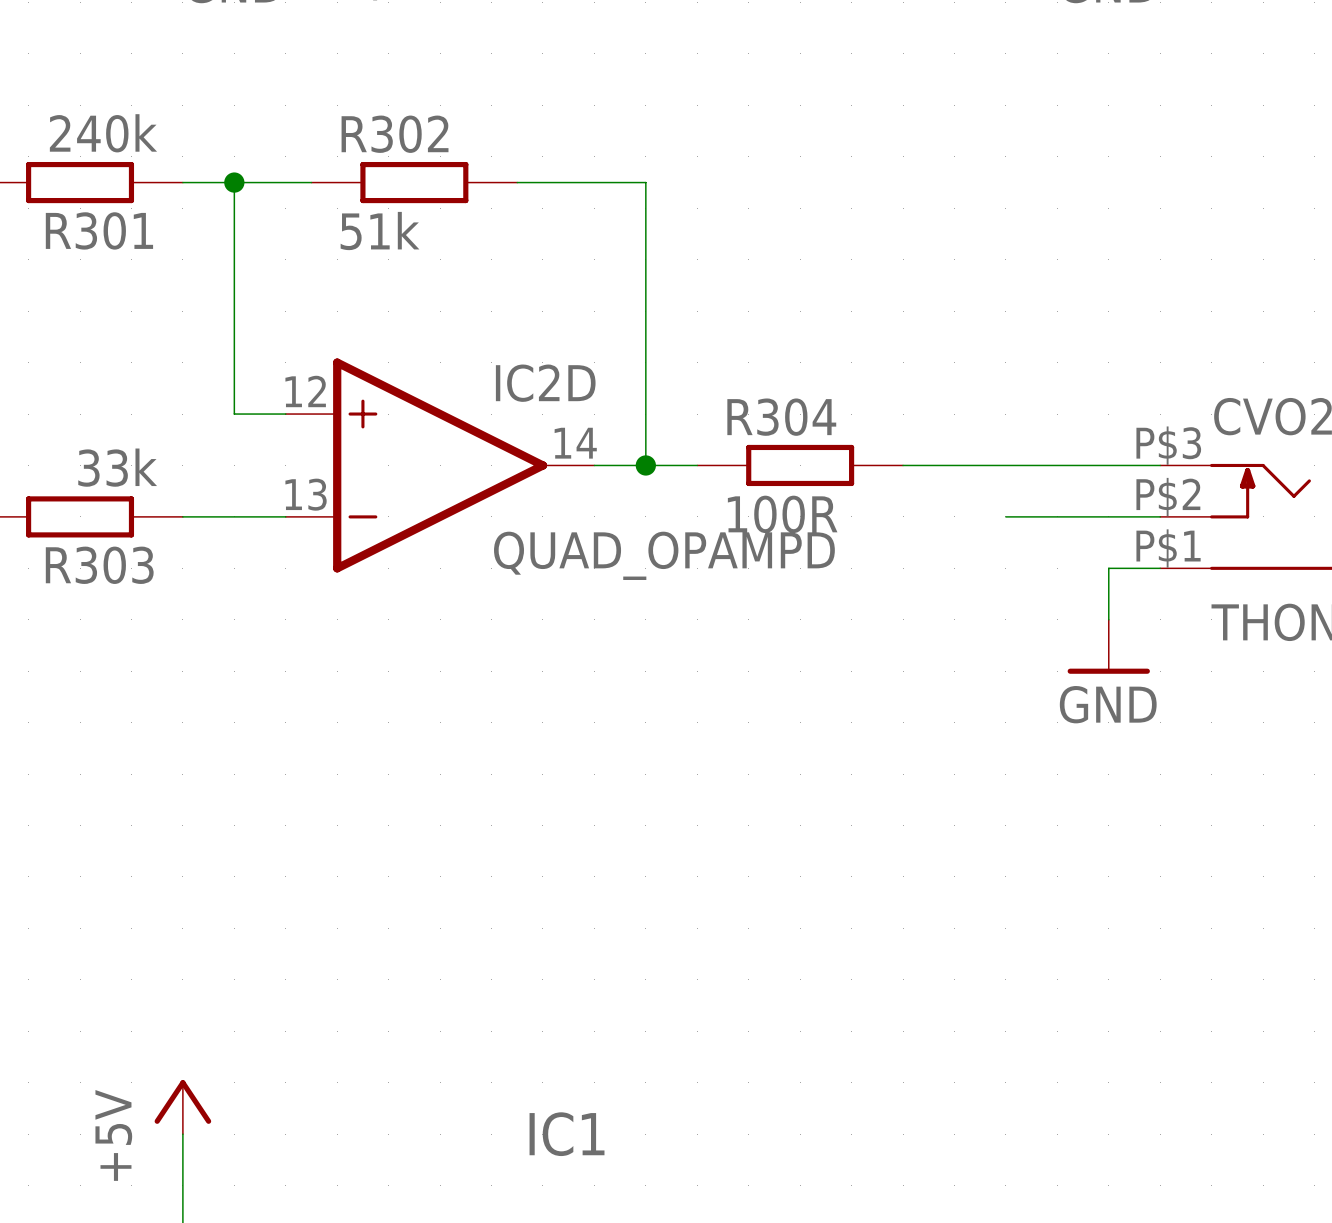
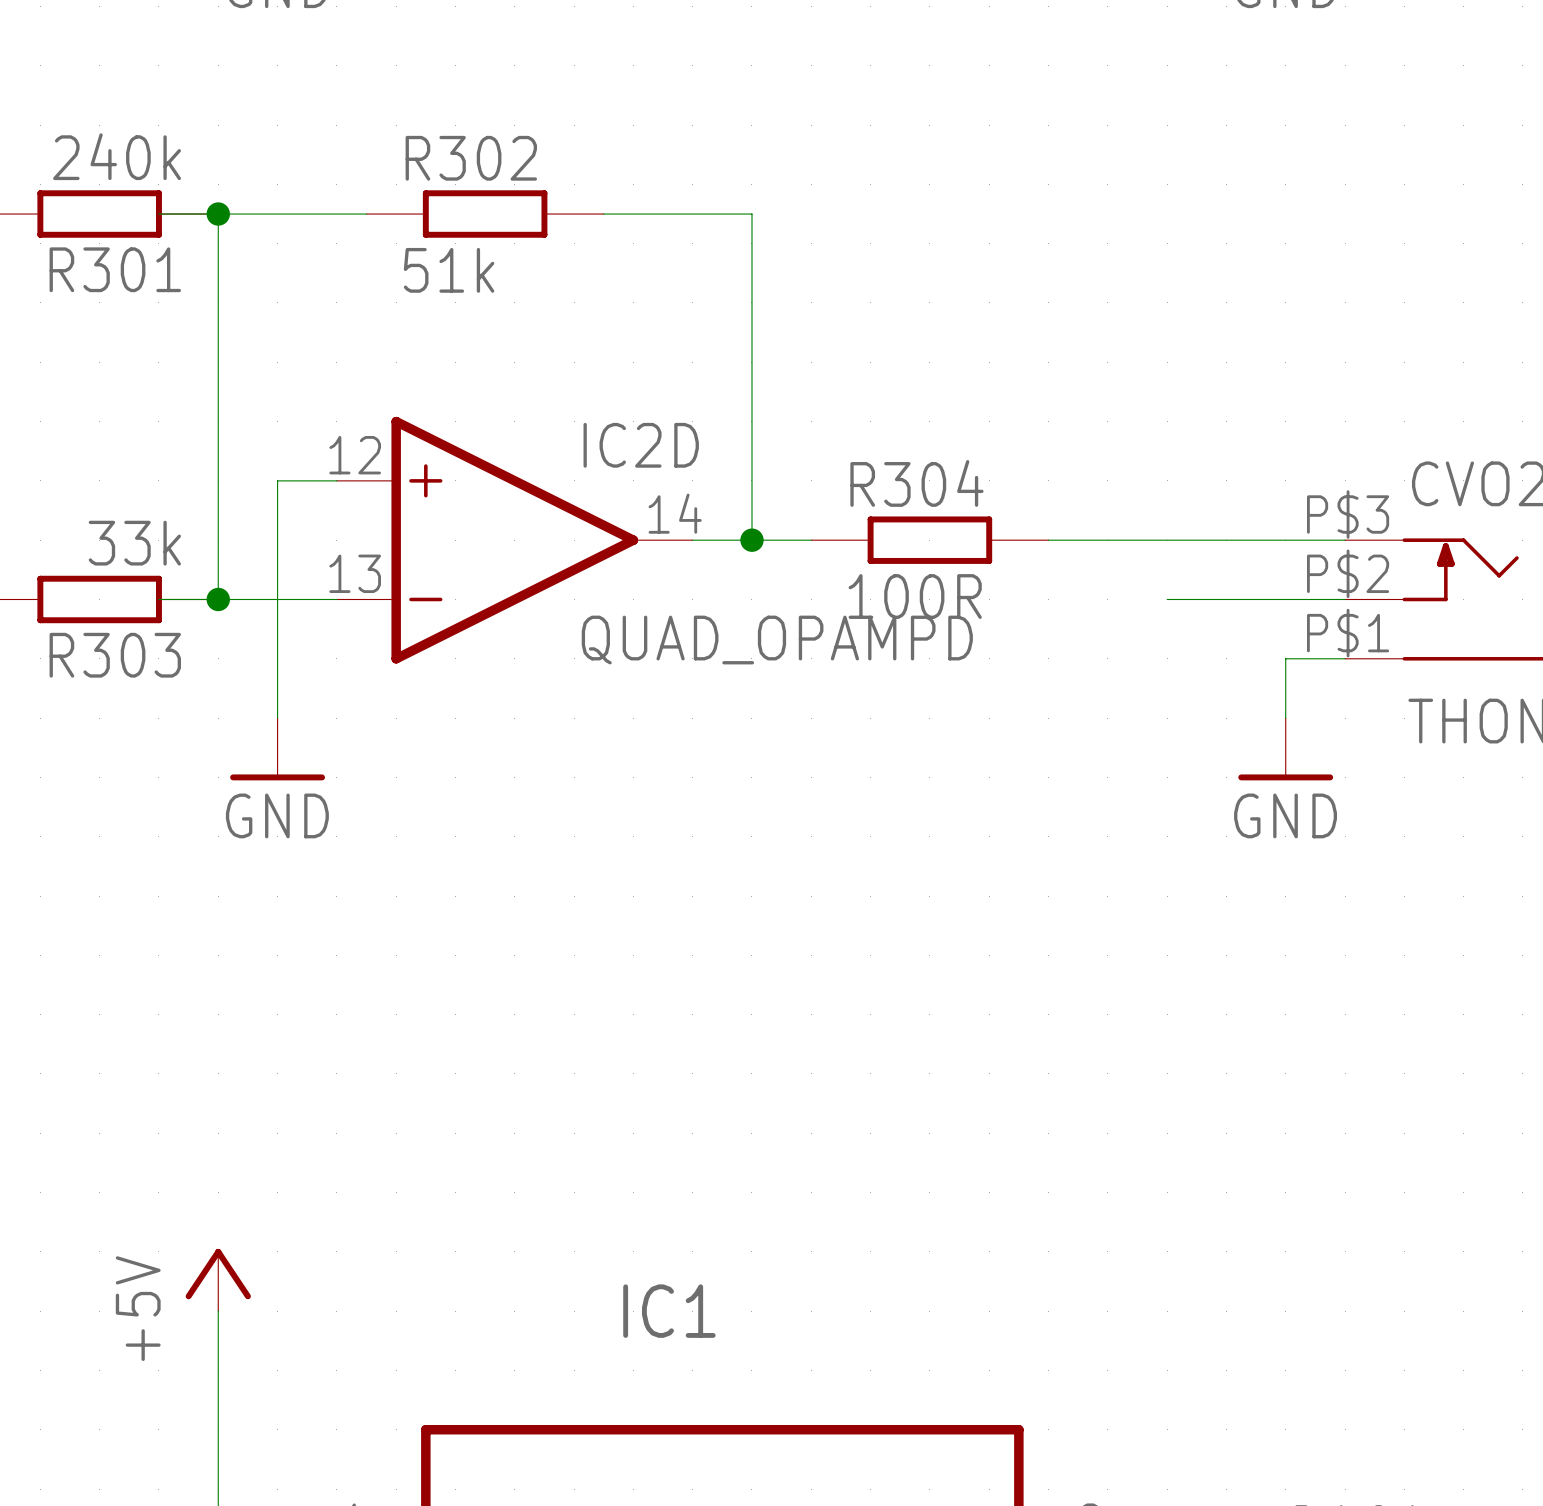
wire: none -> (158, 214) (218, 214) (218, 599) (158, 599)
wire: (234, 182) (234, 414) -> (277, 718) (277, 480)
junction position: (234, 182) -> (218, 214)
junction: none -> (218, 599)
power symbol: none -> GND (277, 749)

